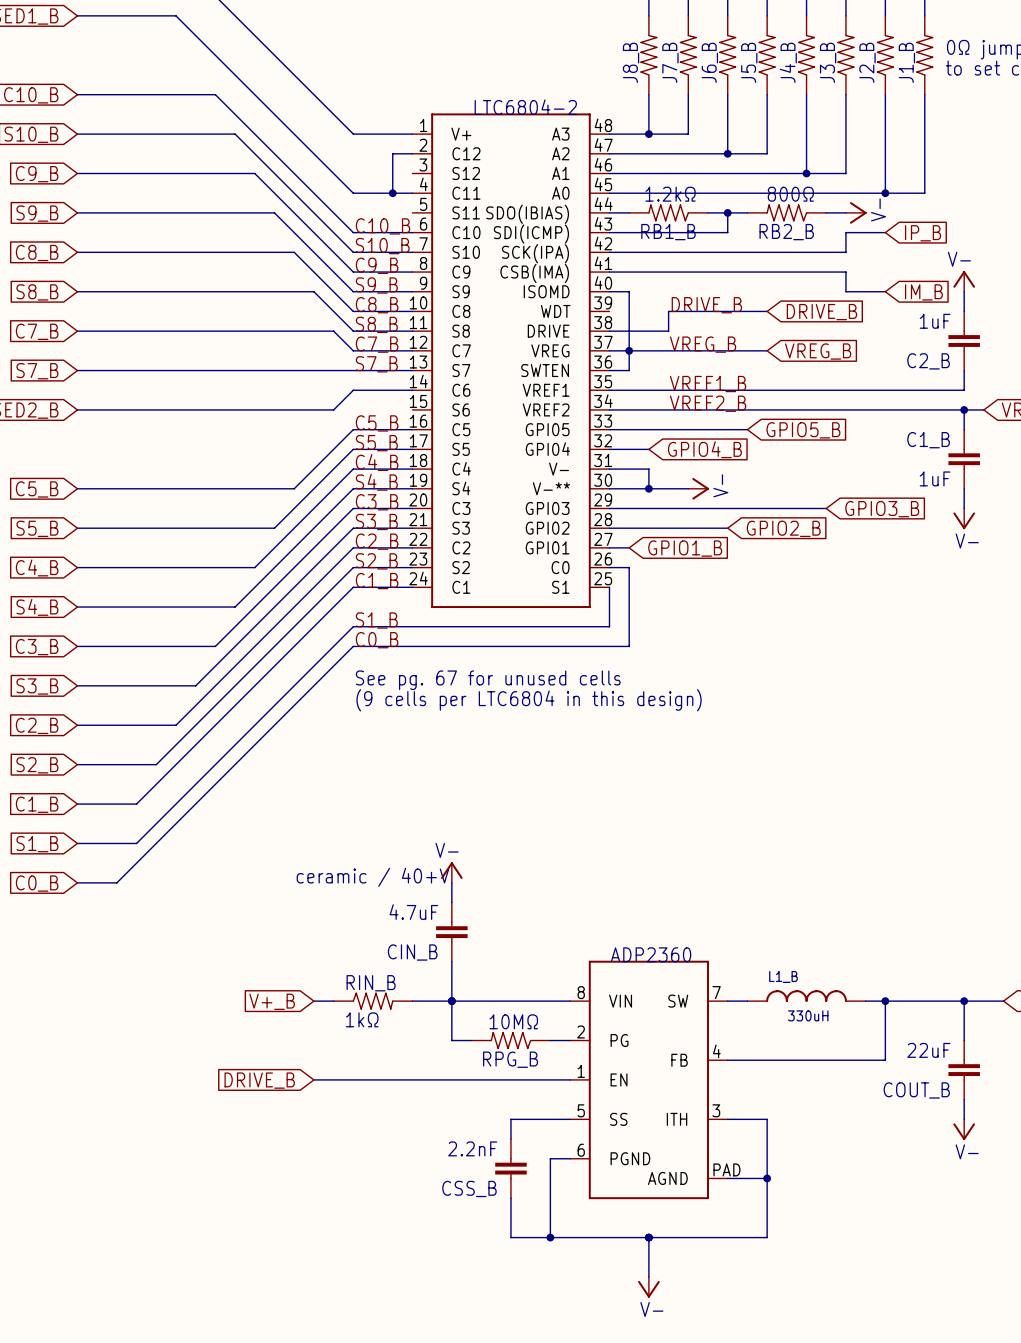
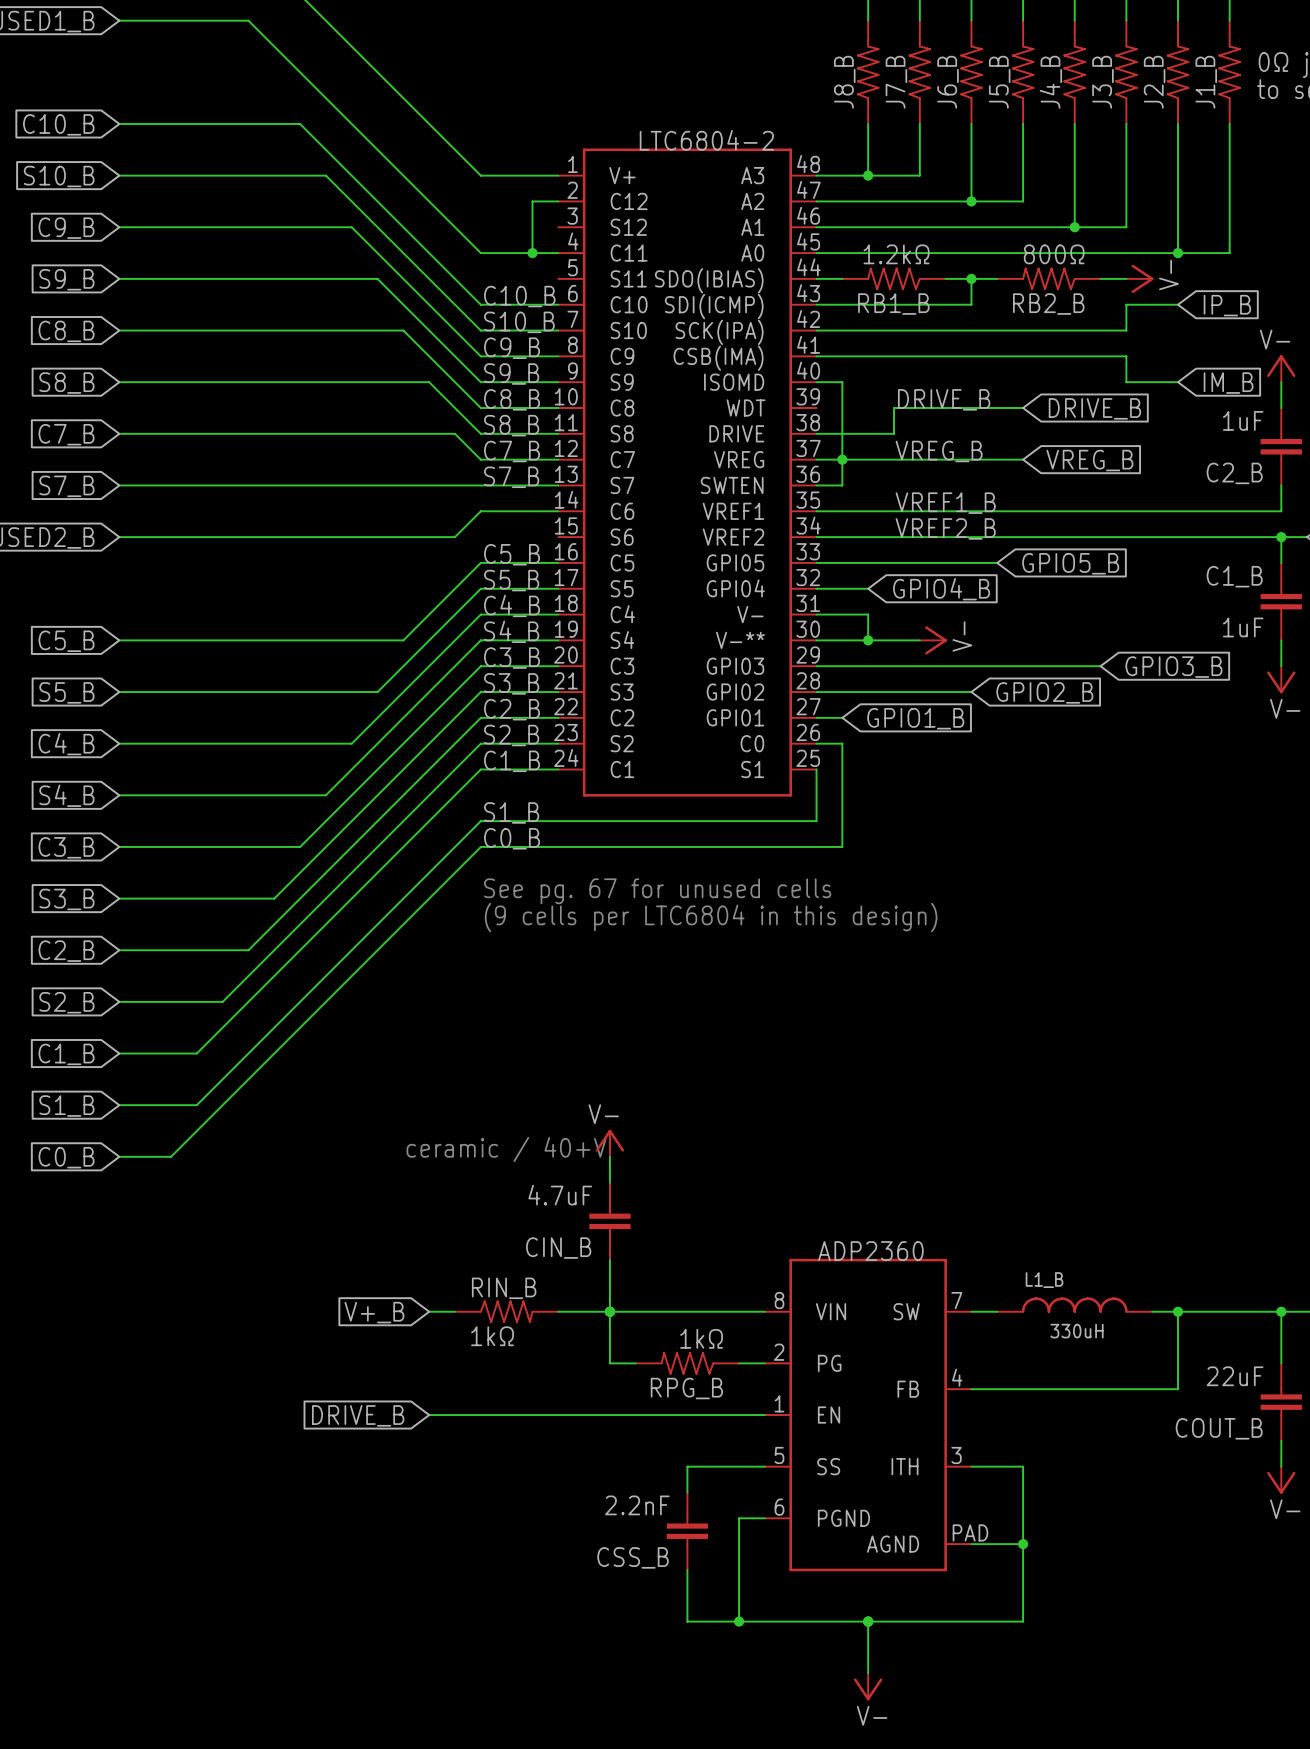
RPG_B value: 10MΩ (513, 1021) -> 1kΩ (701, 1338)

